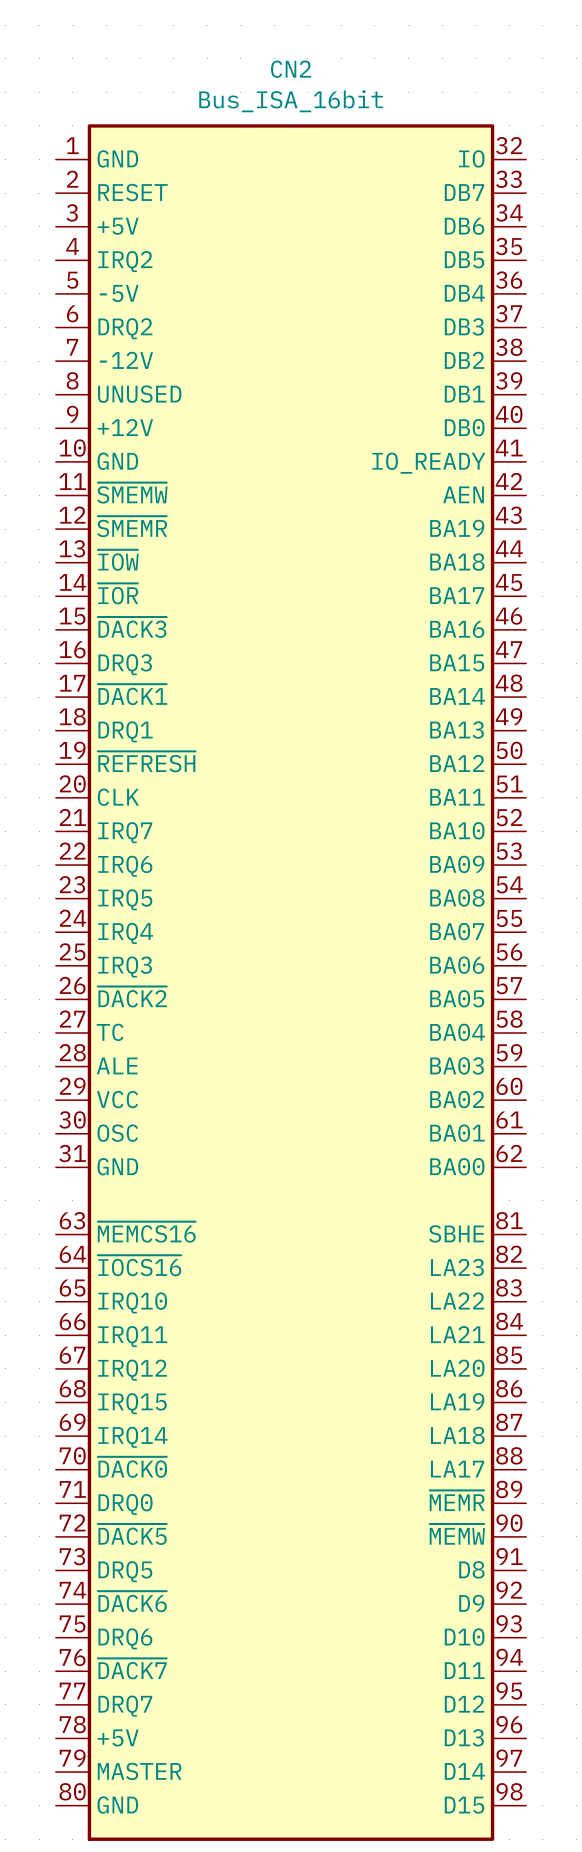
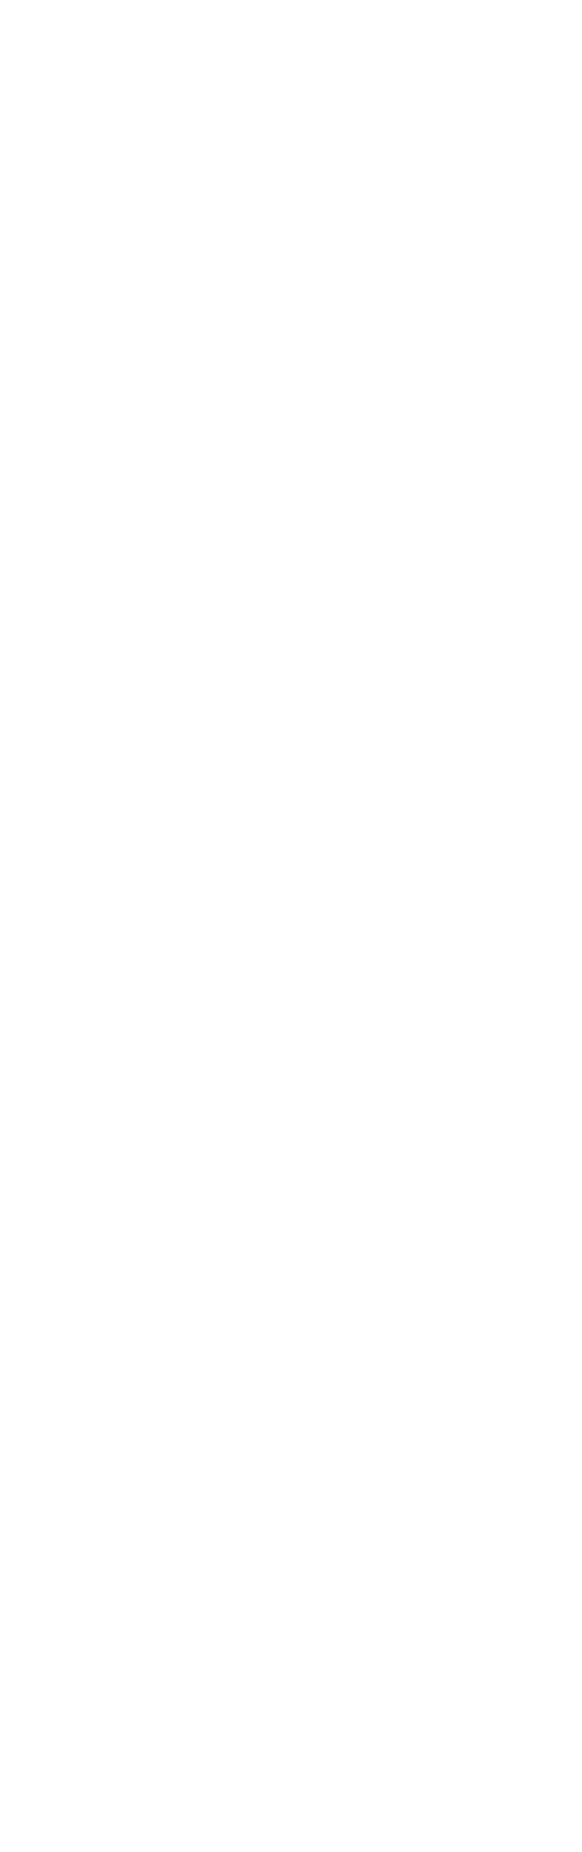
CN2: Bus_ISA_16bit (290, 982) -> none

